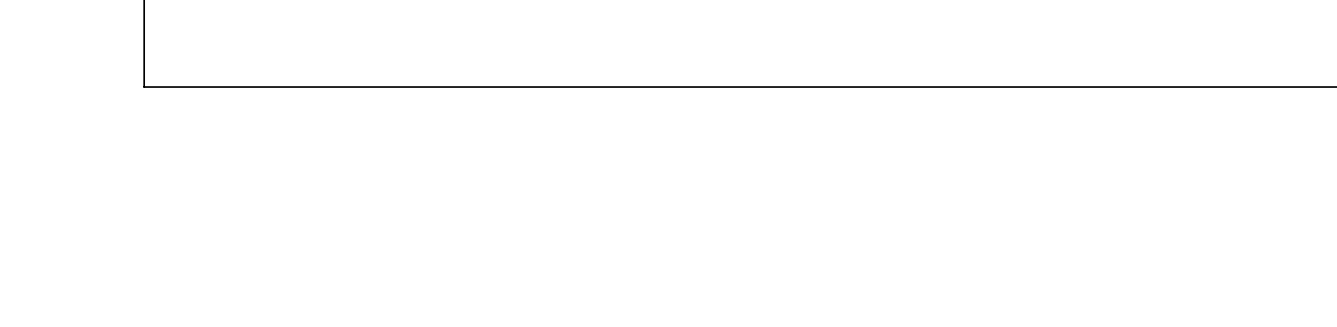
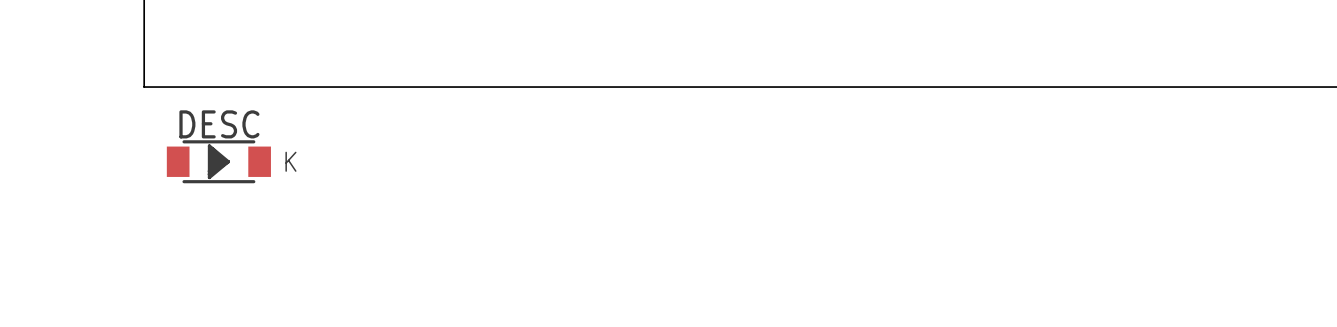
DESC: none -> (218, 161)

